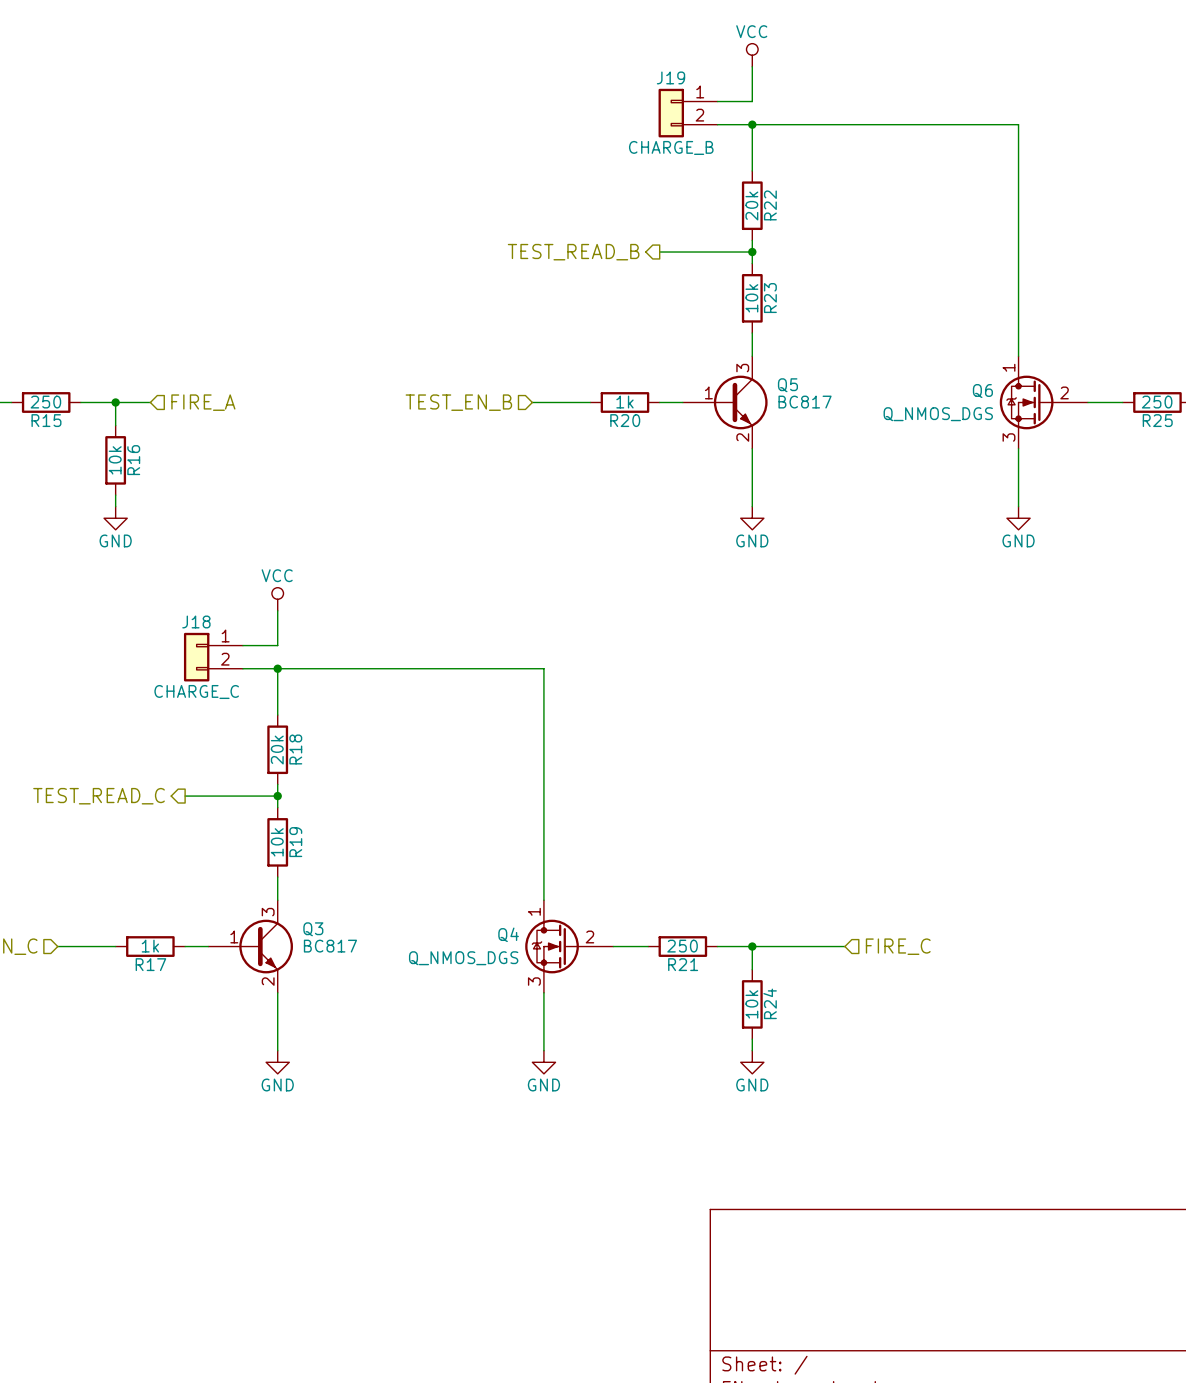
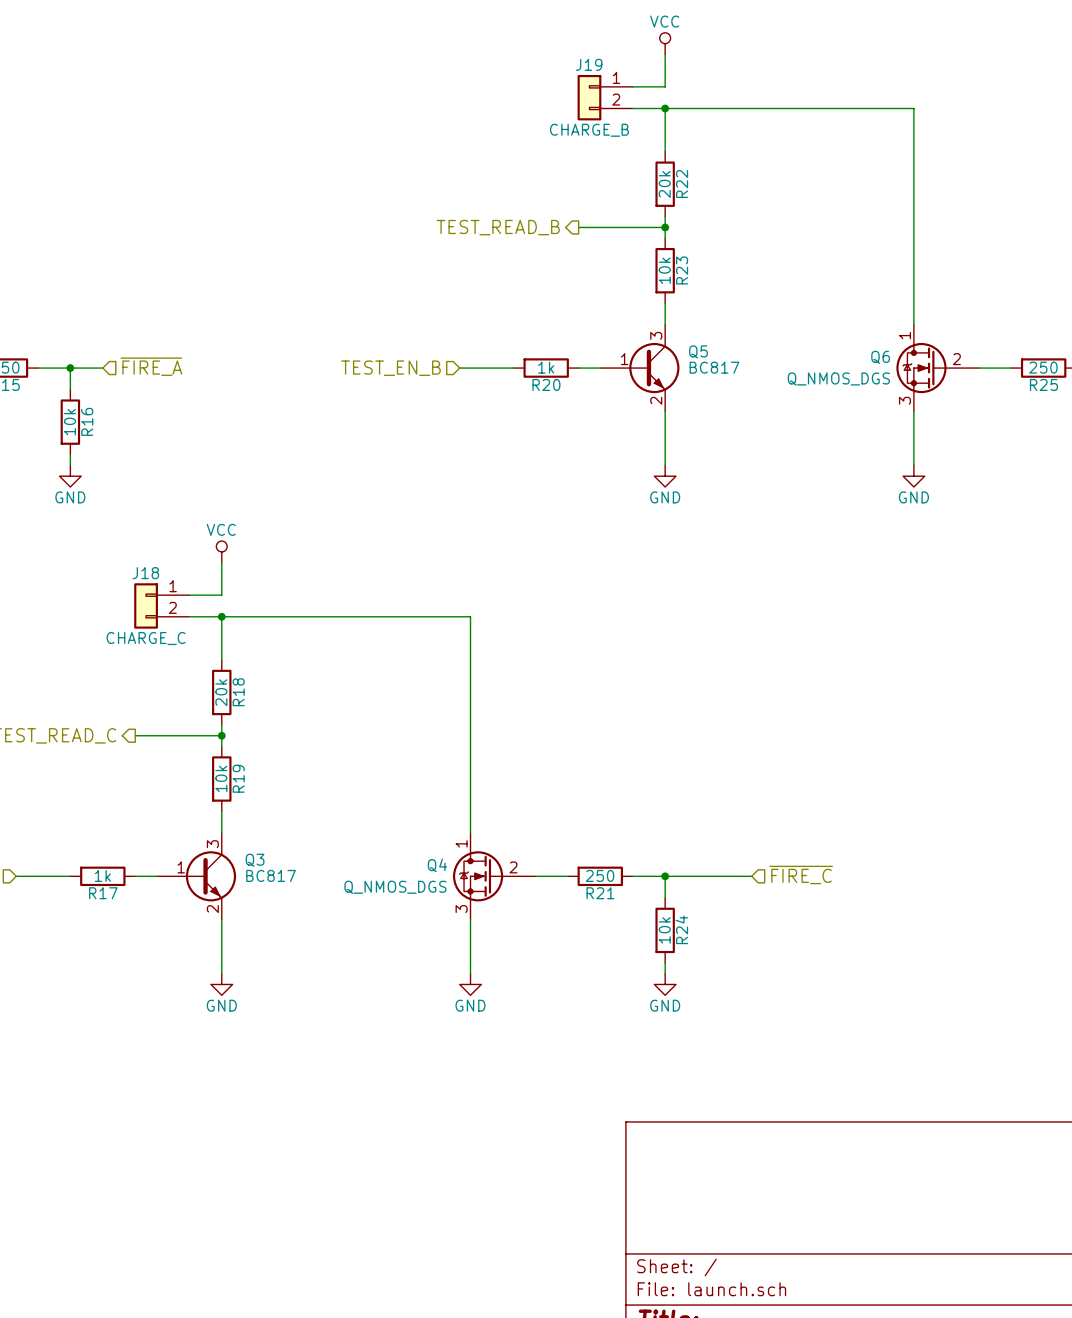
hierarchical label: FIRE_A (203, 402) -> ~{FIRE_A} (151, 366)
hierarchical label: FIRE_C (898, 946) -> ~{FIRE_C} (801, 874)

